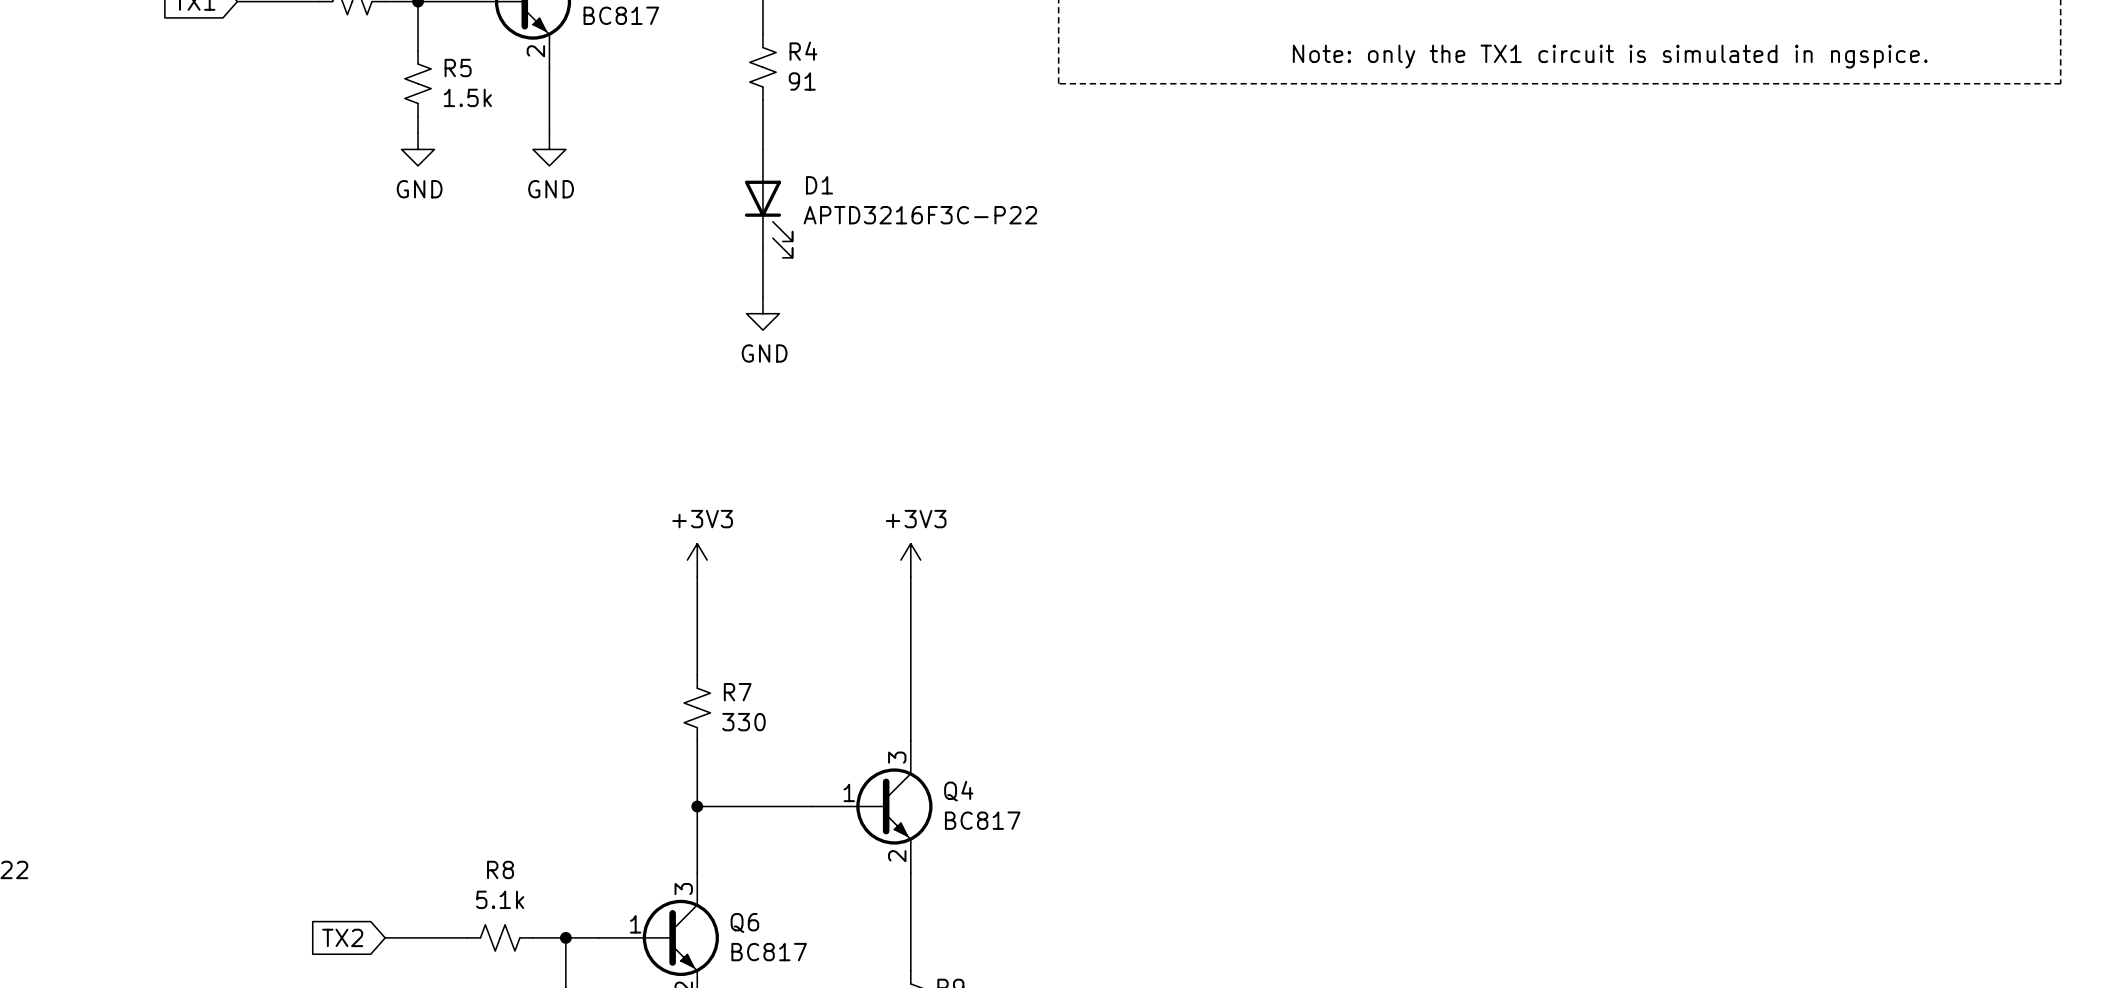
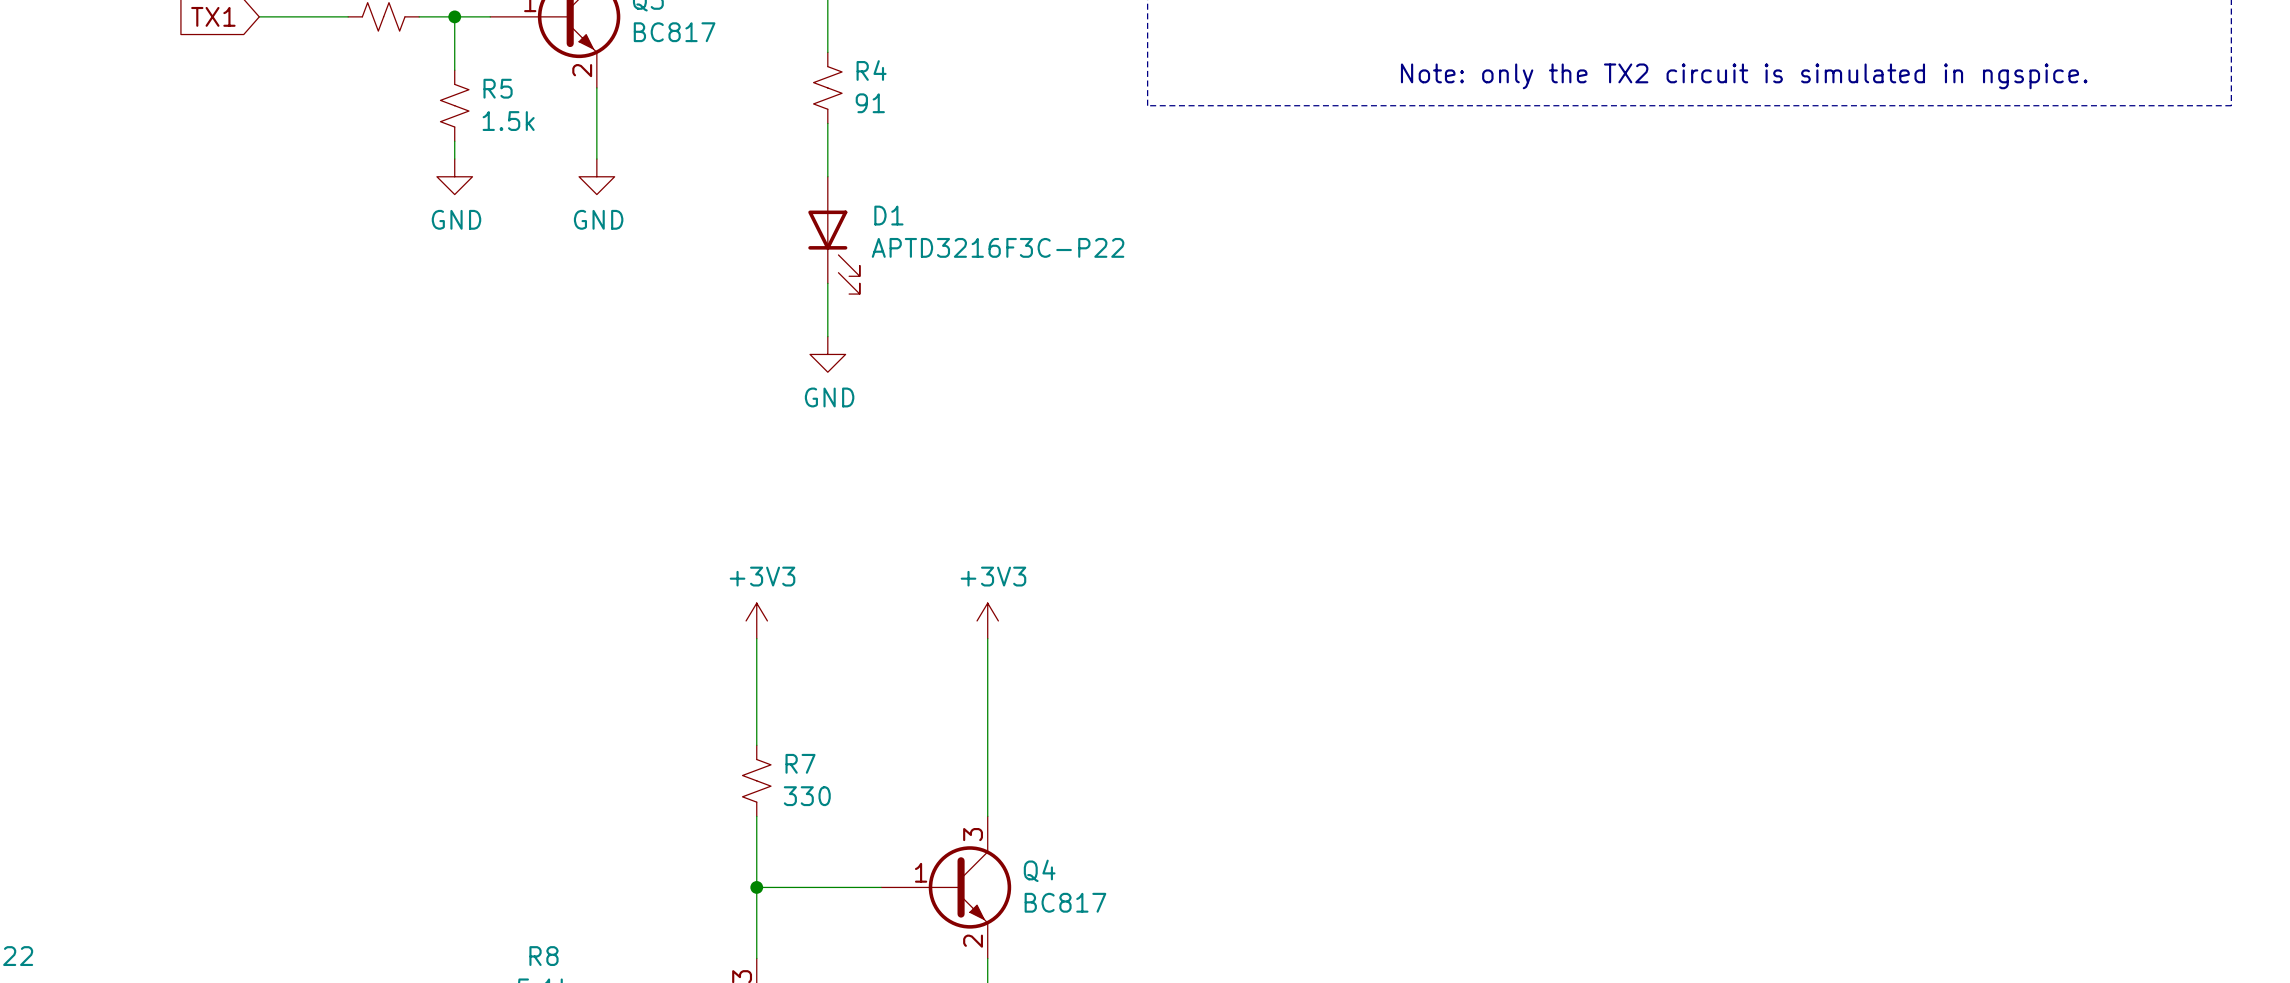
text: Note: only the TX1 circuit is simulated in ngspice. (1610, 56) -> Note: only the TX2 circuit is simulated in ngspice. (1744, 76)

